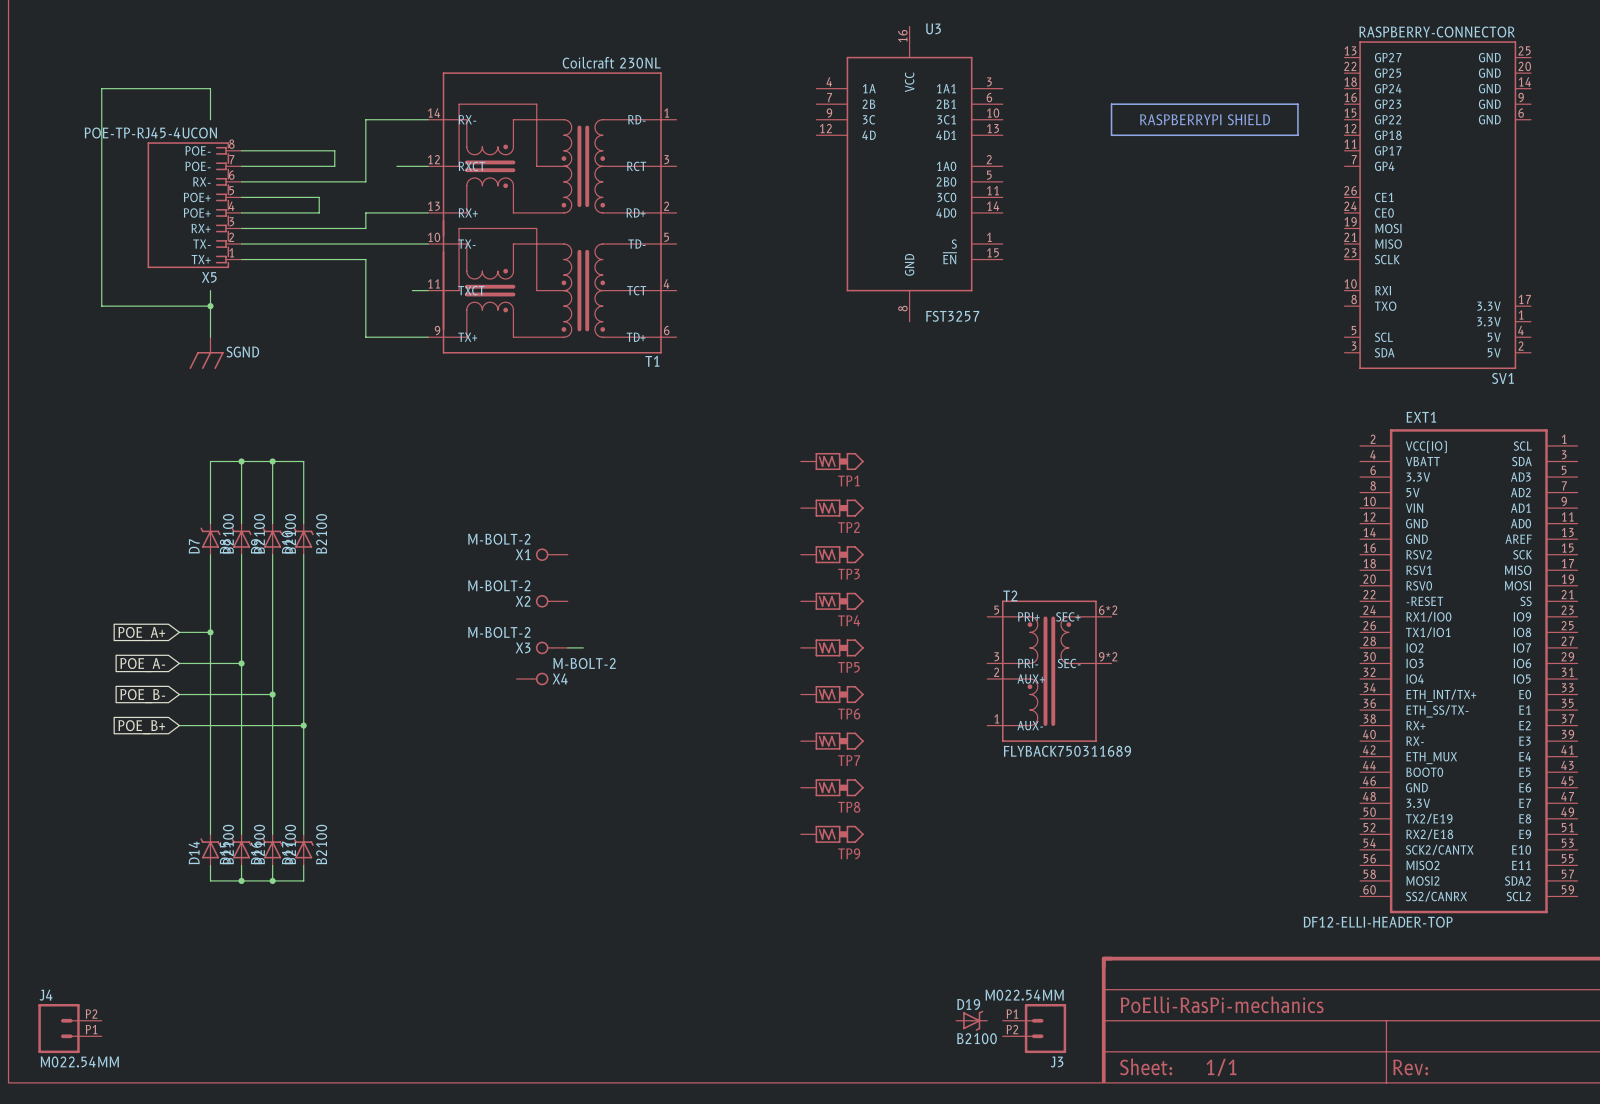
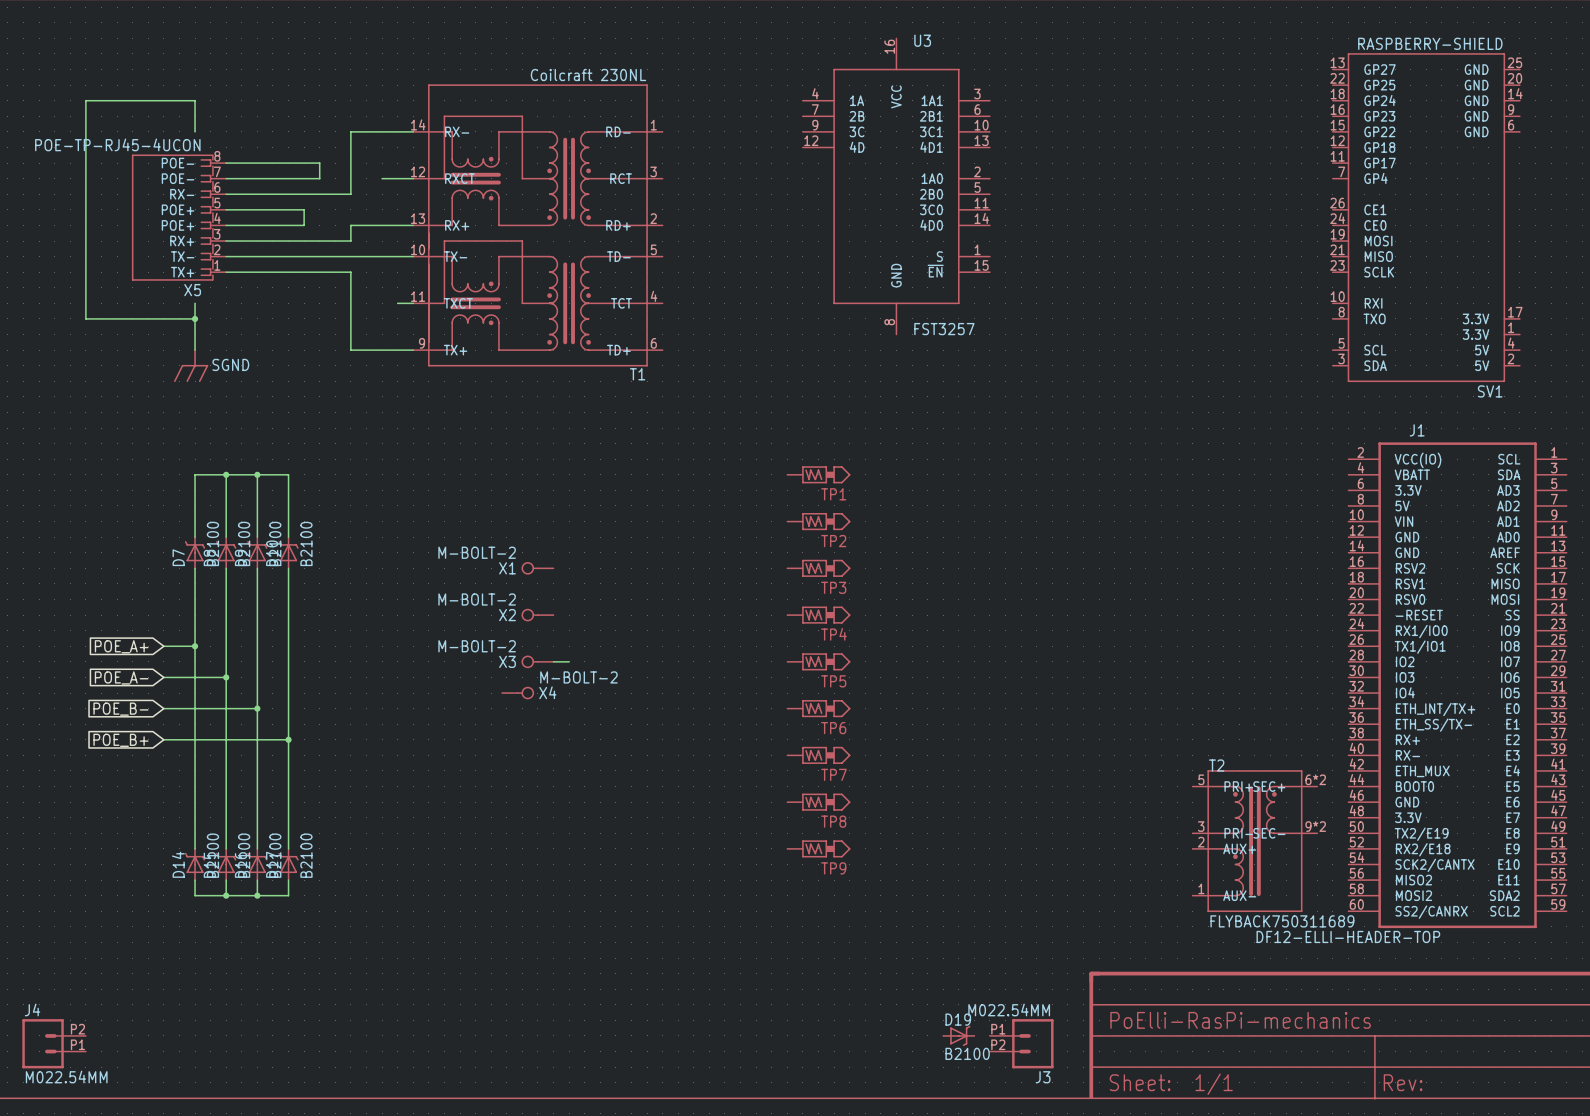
SV1 value: RASPBERRY-CONNECTOR (1437, 32) -> RASPBERRY-SHIELD (1430, 43)
part: (1204, 119) -> none
EXT1 name: EXT1 (1421, 417) -> J1 (1417, 430)
T2 position: (1049, 671) -> (1254, 841)

